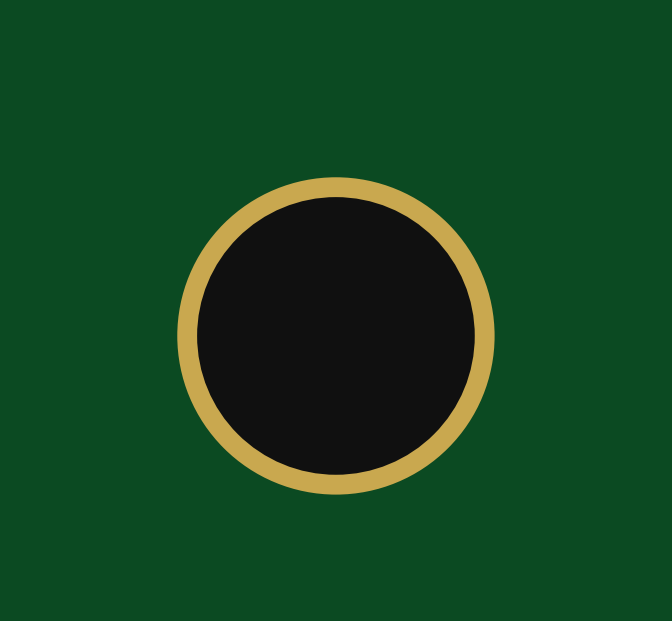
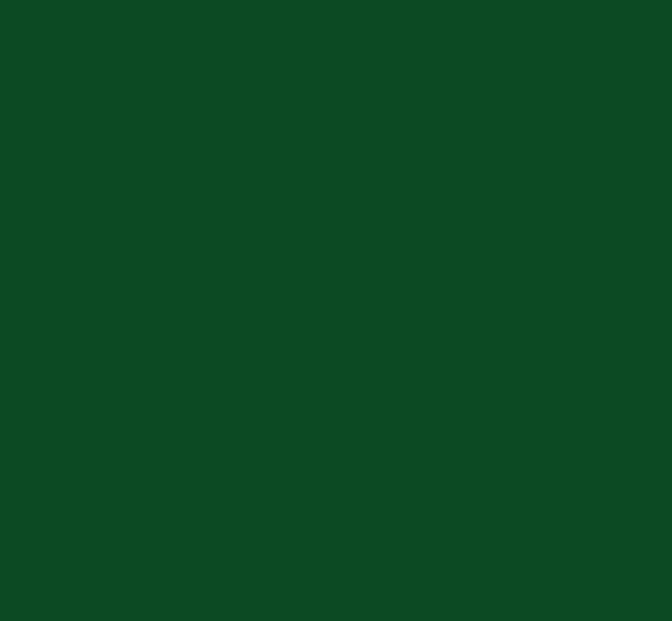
via: (335, 335) -> none

